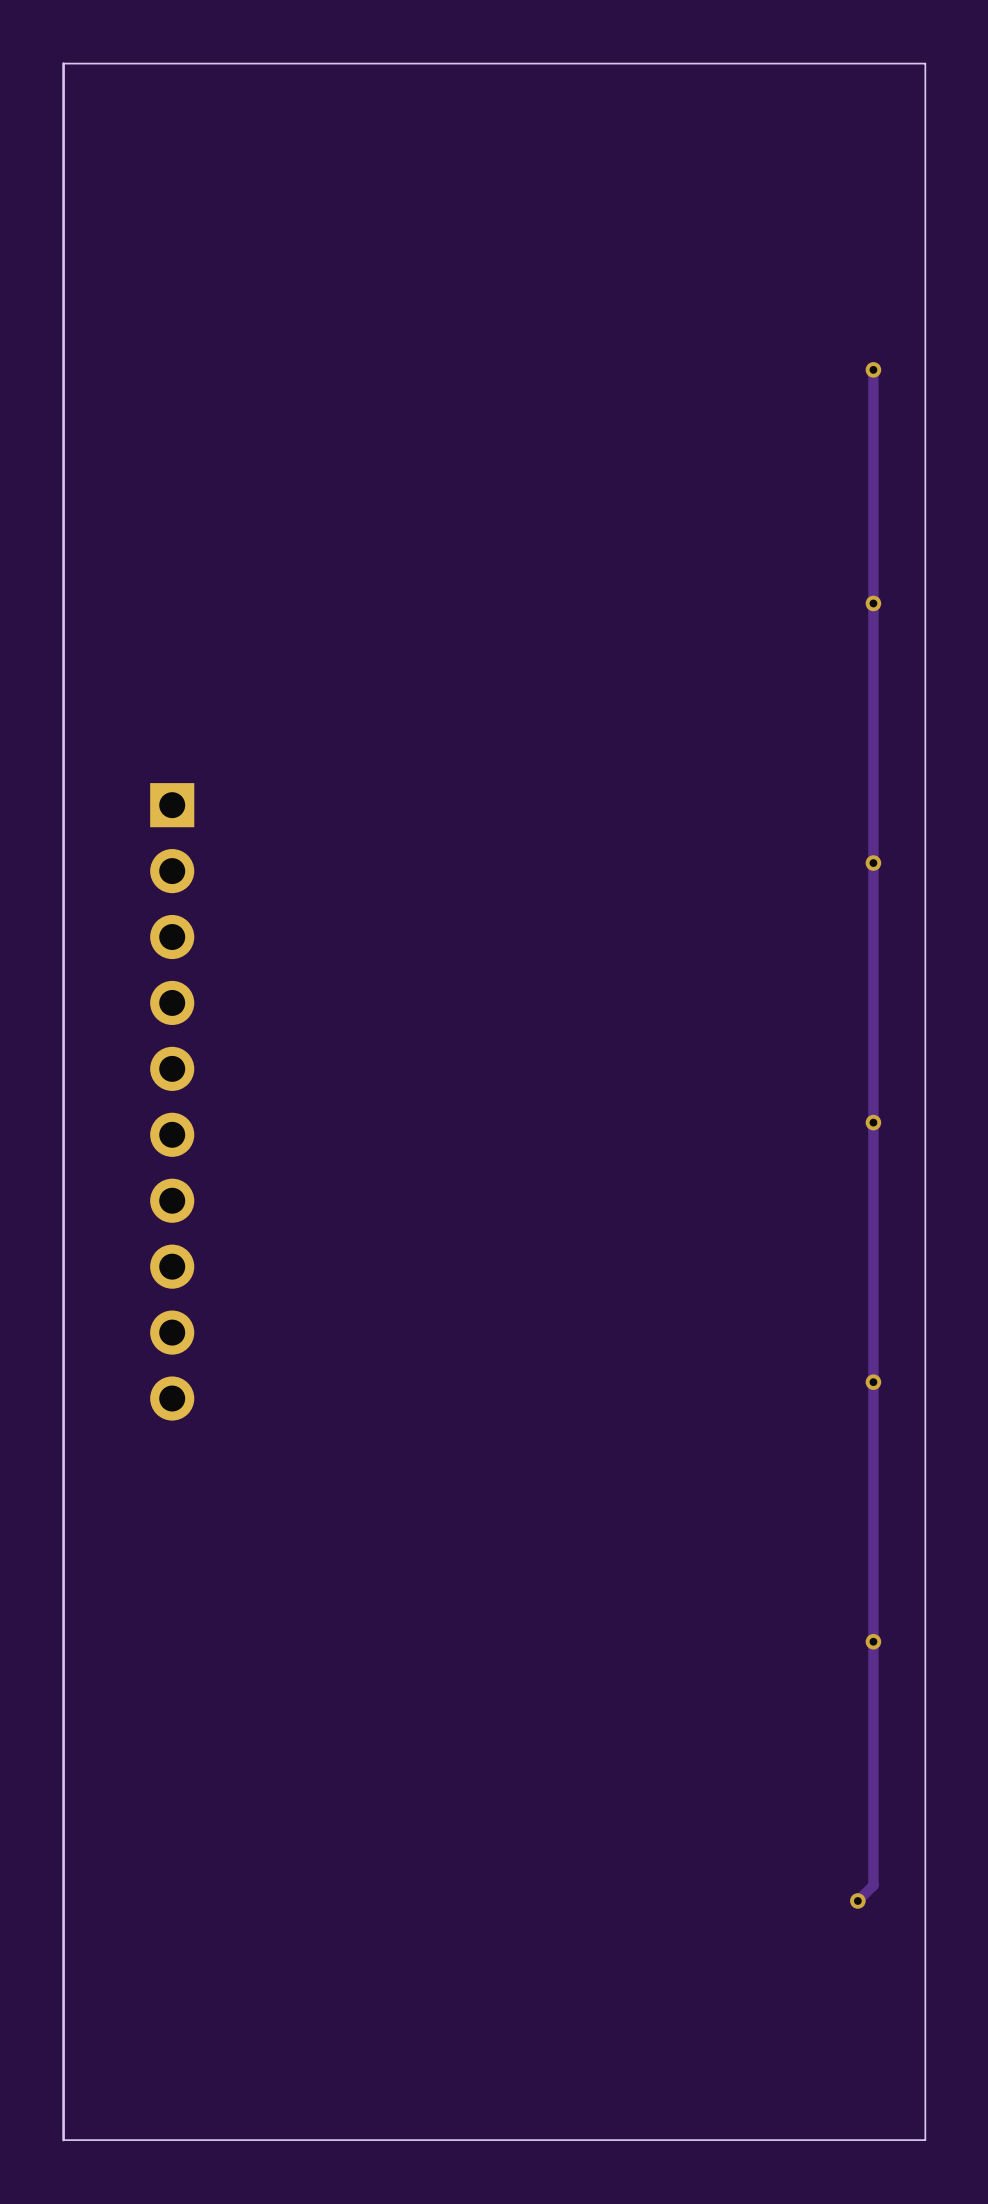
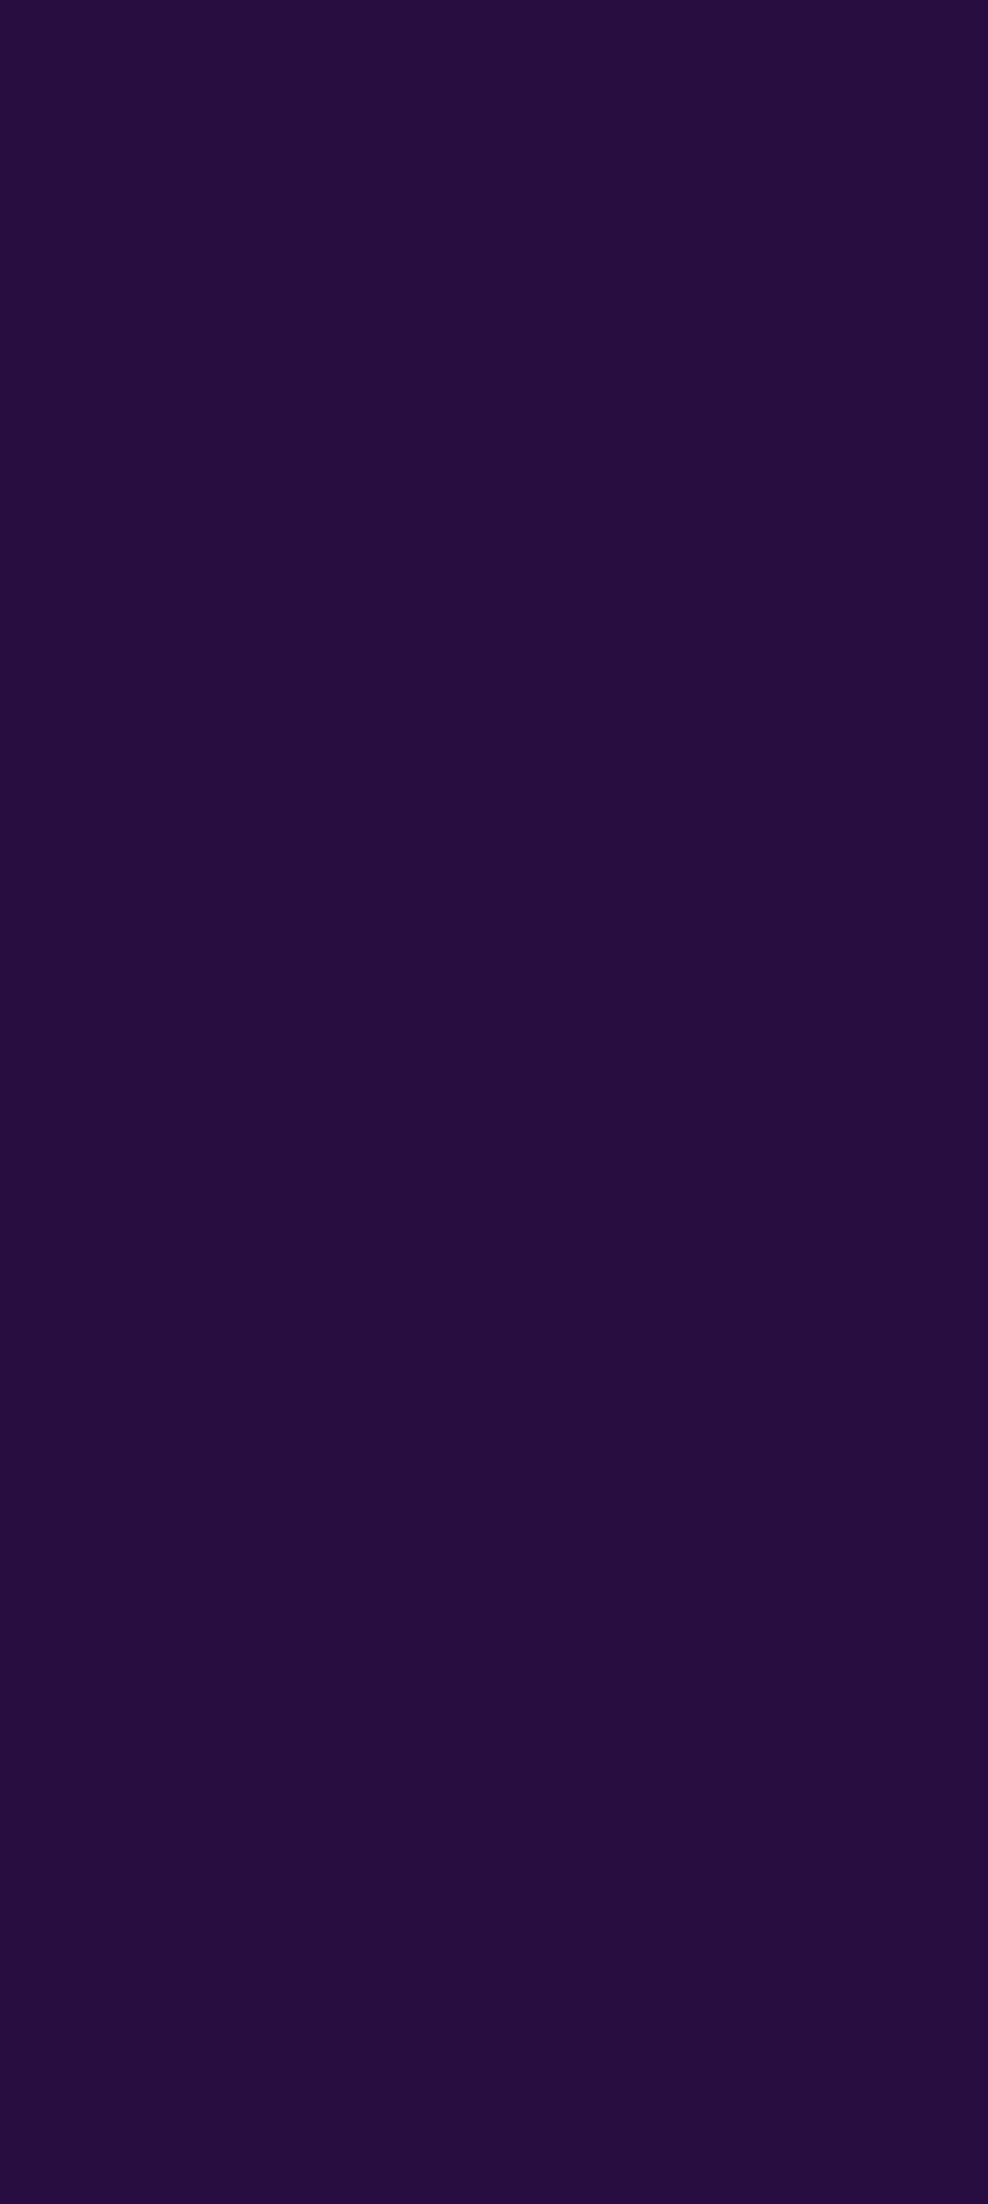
board edge: (925, 63) (63, 63) (63, 2140) (925, 2140) (925, 63) -> none
track: (873, 369) (873, 1885) (857, 1900) -> none
via: (873, 369) -> none
via: (873, 603) -> none
via: (873, 863) -> none
part: (172, 1101) -> none
via: (873, 1122) -> none
via: (873, 1382) -> none
via: (873, 1641) -> none
via: (857, 1900) -> none

